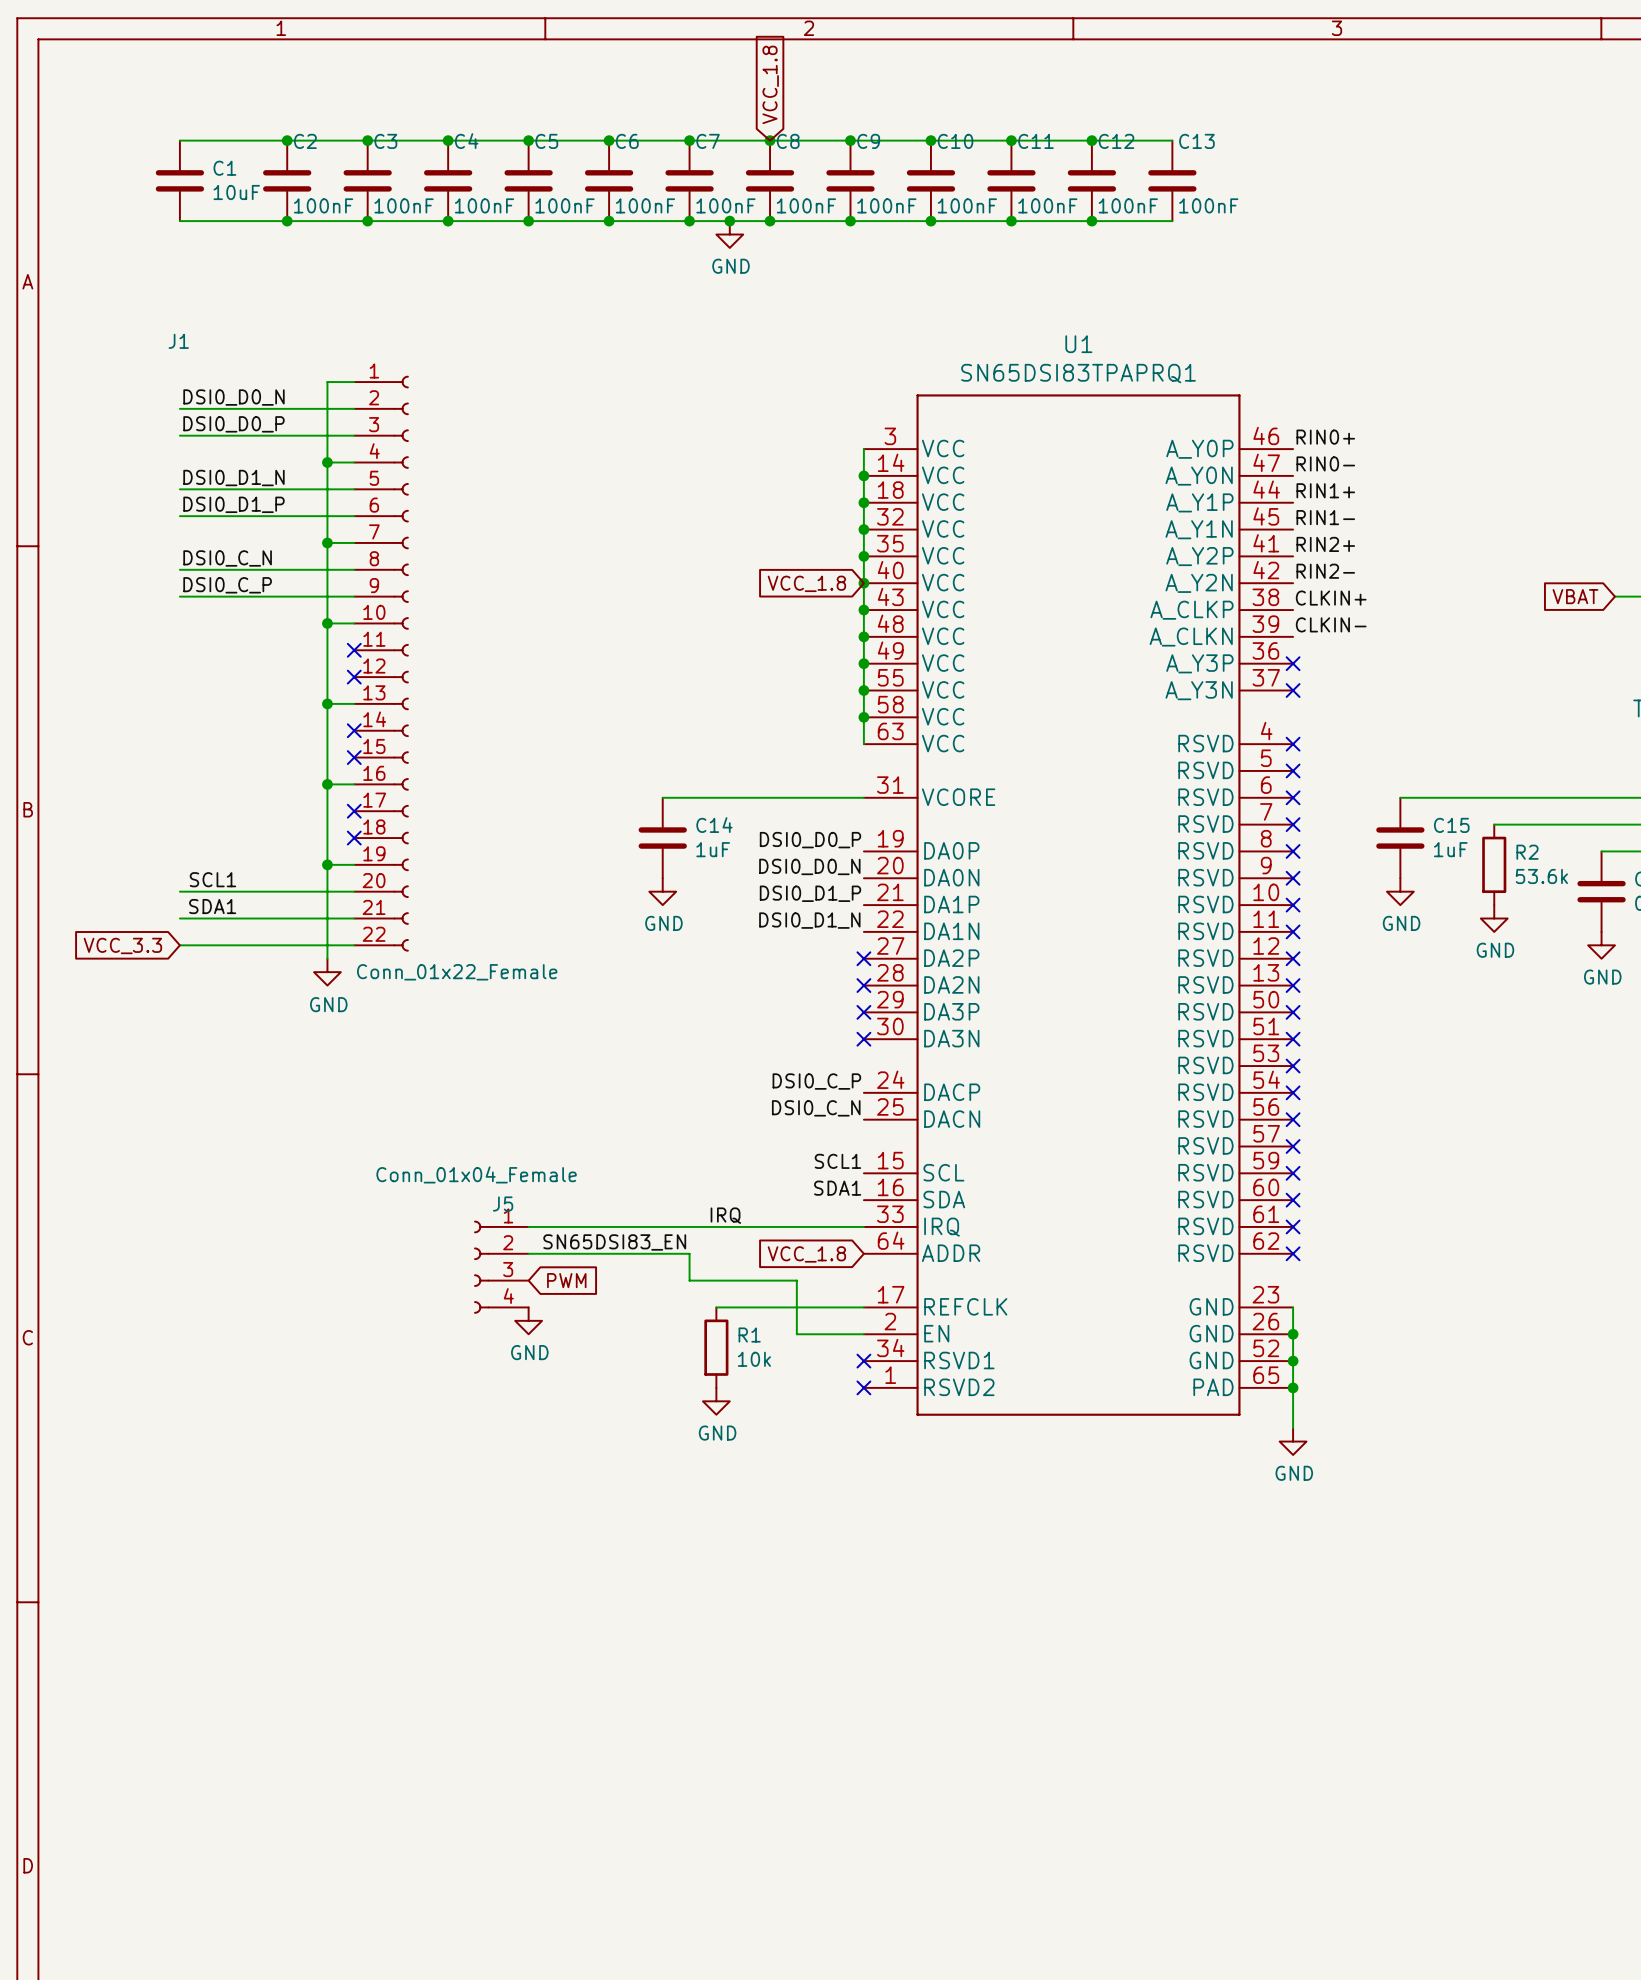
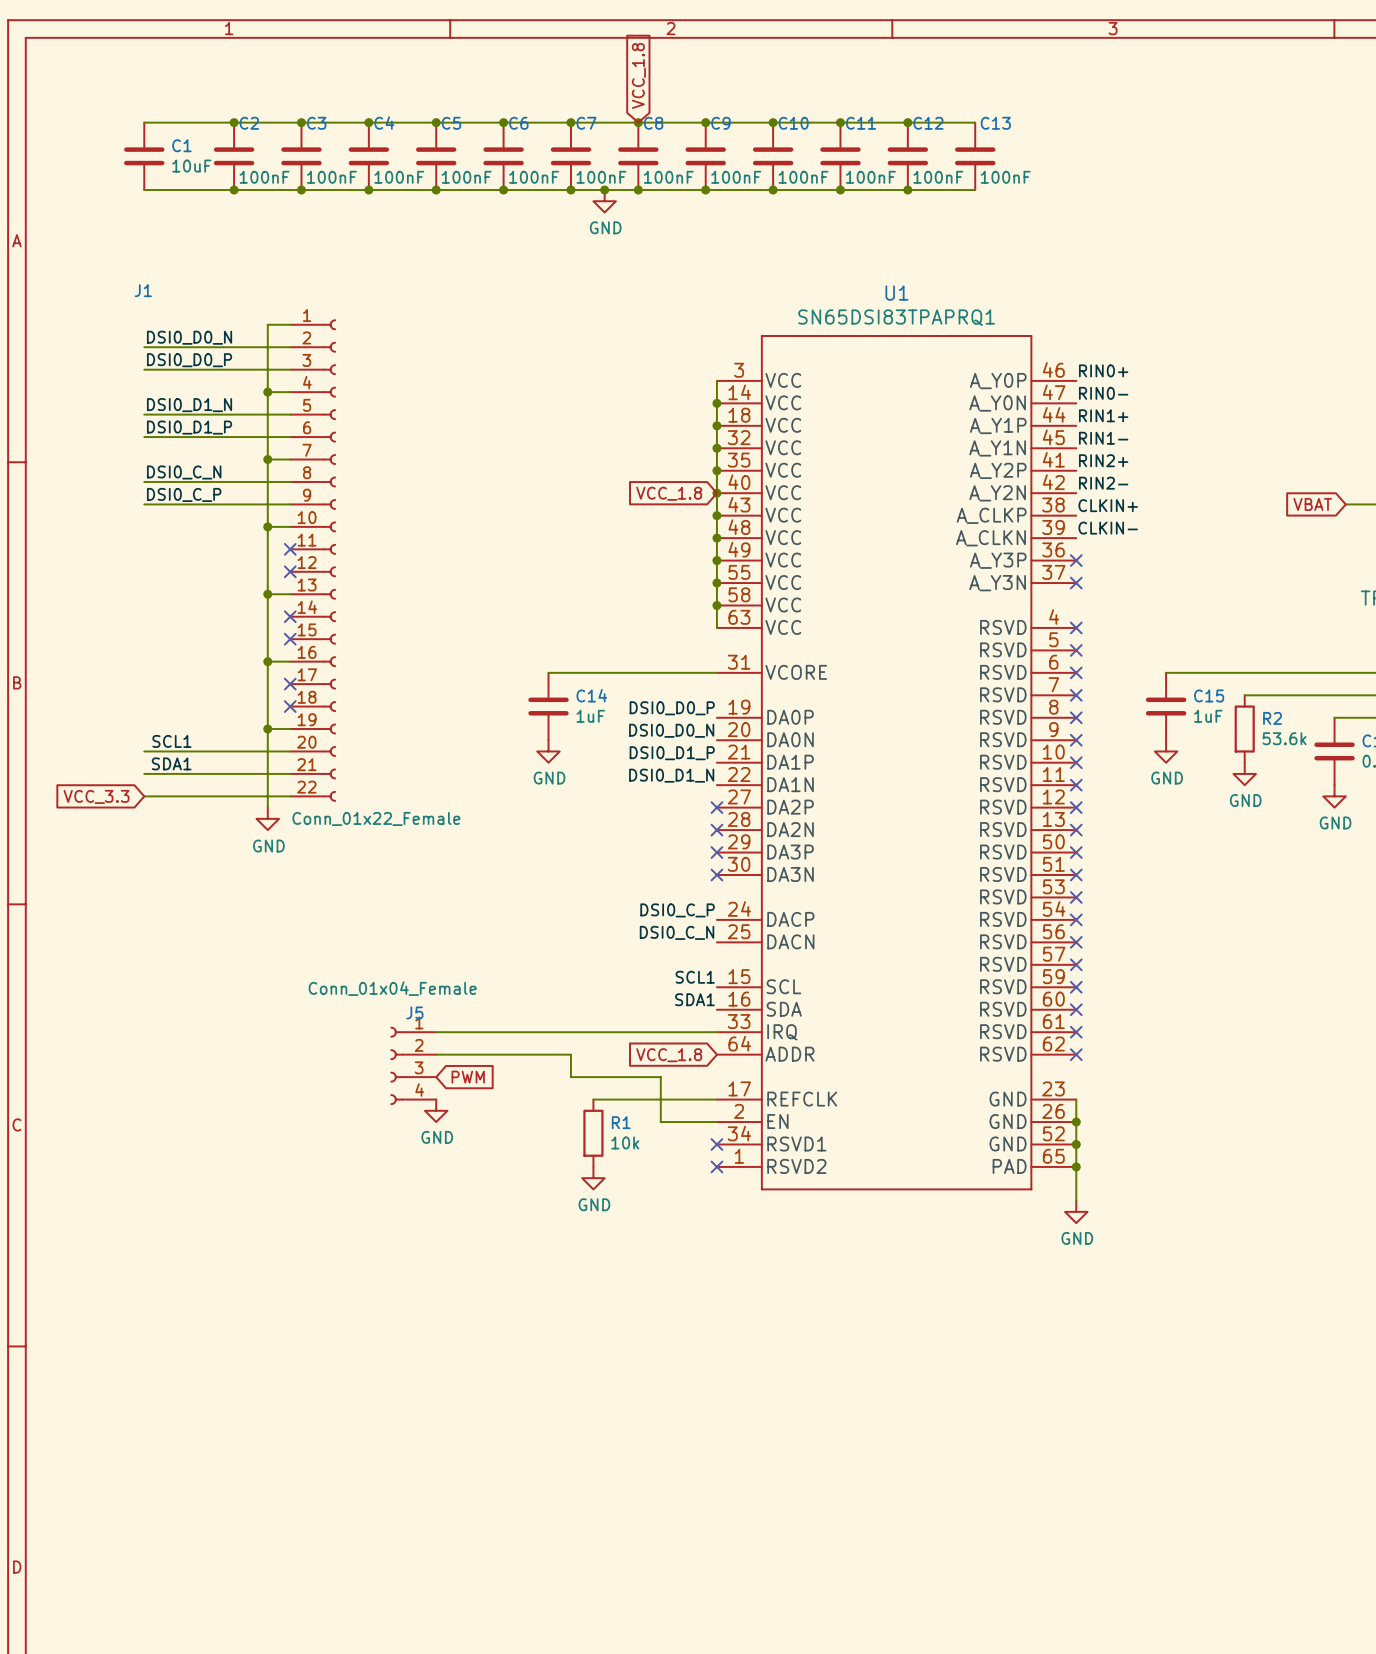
label: IRQ (725, 1215) -> none
label: SN65DSI83_EN (614, 1242) -> none

